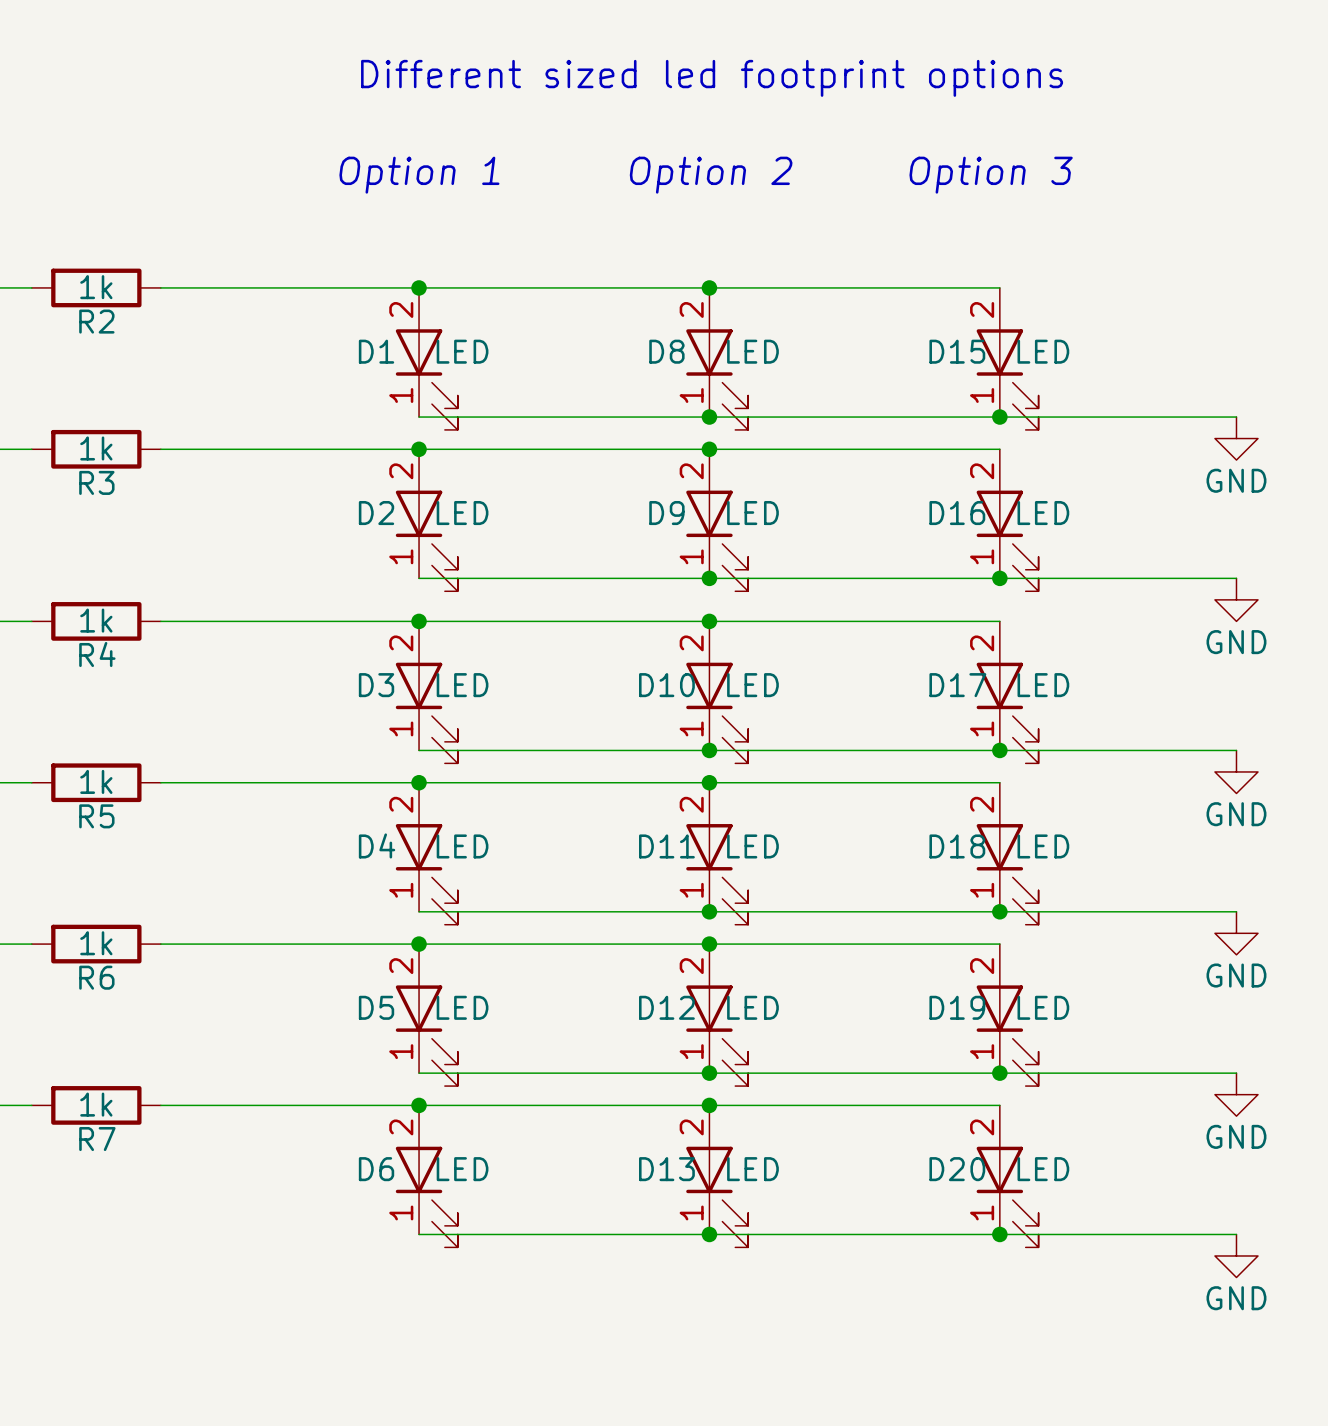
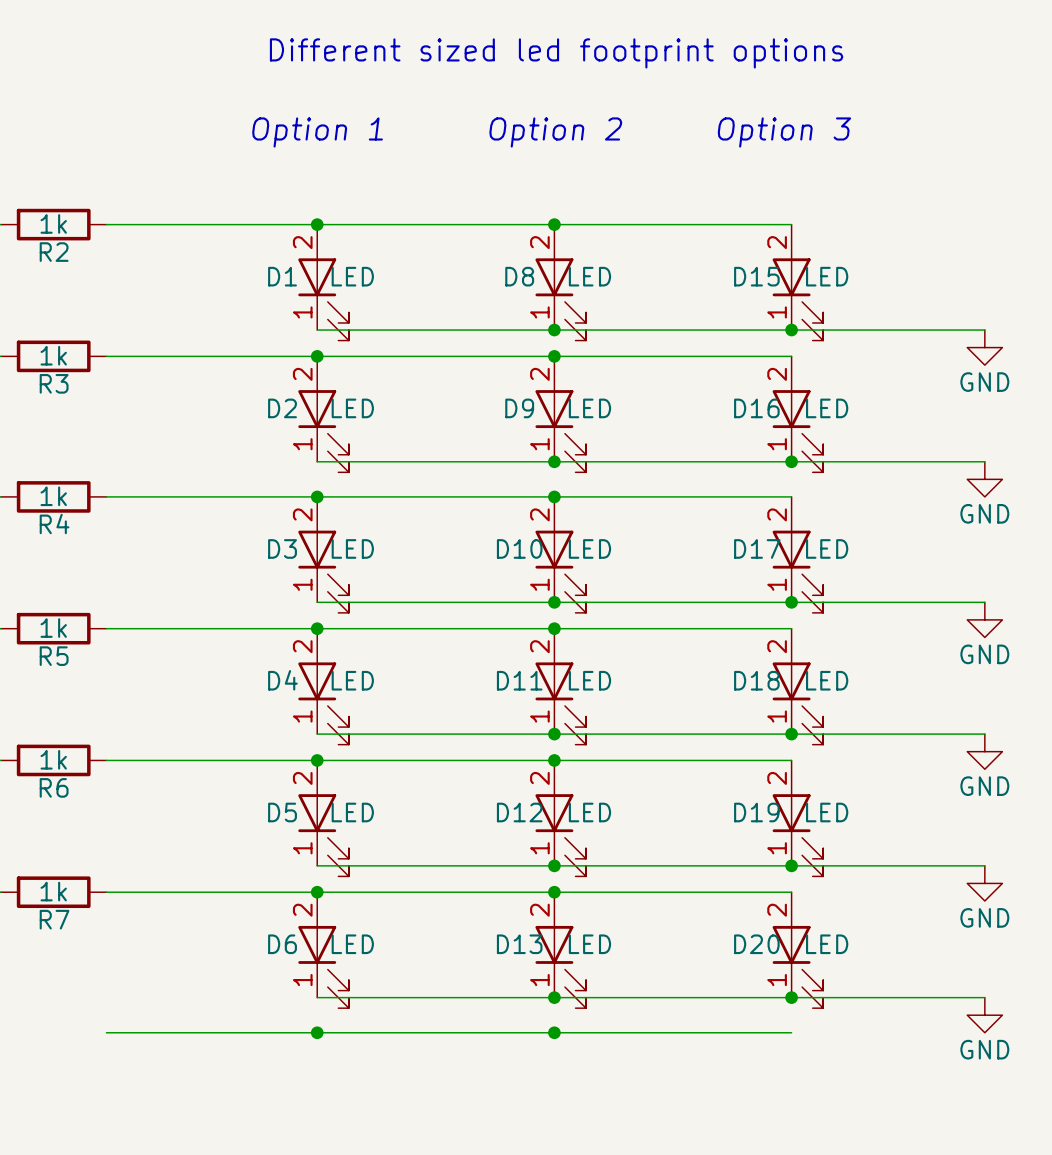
wire: none -> (106, 1032) (791, 1032)
junction: none -> (317, 1032)
junction: none -> (554, 1032)

